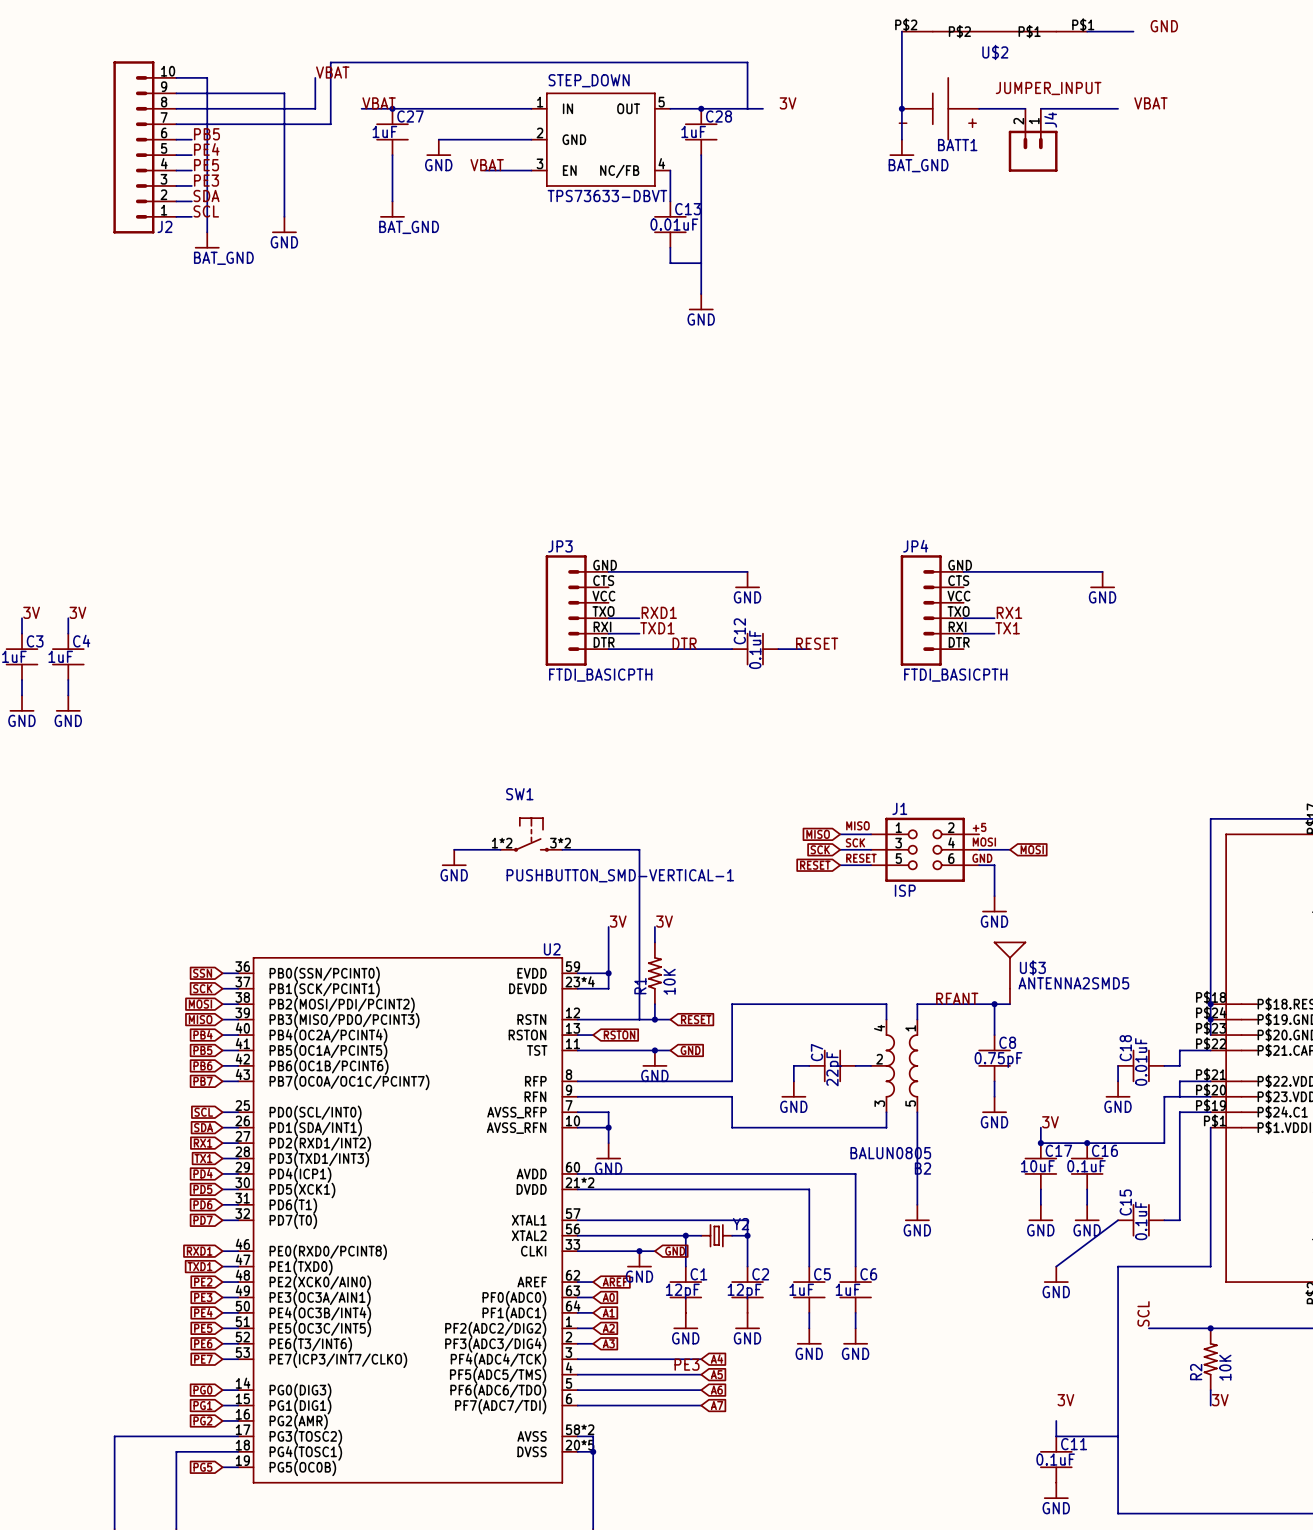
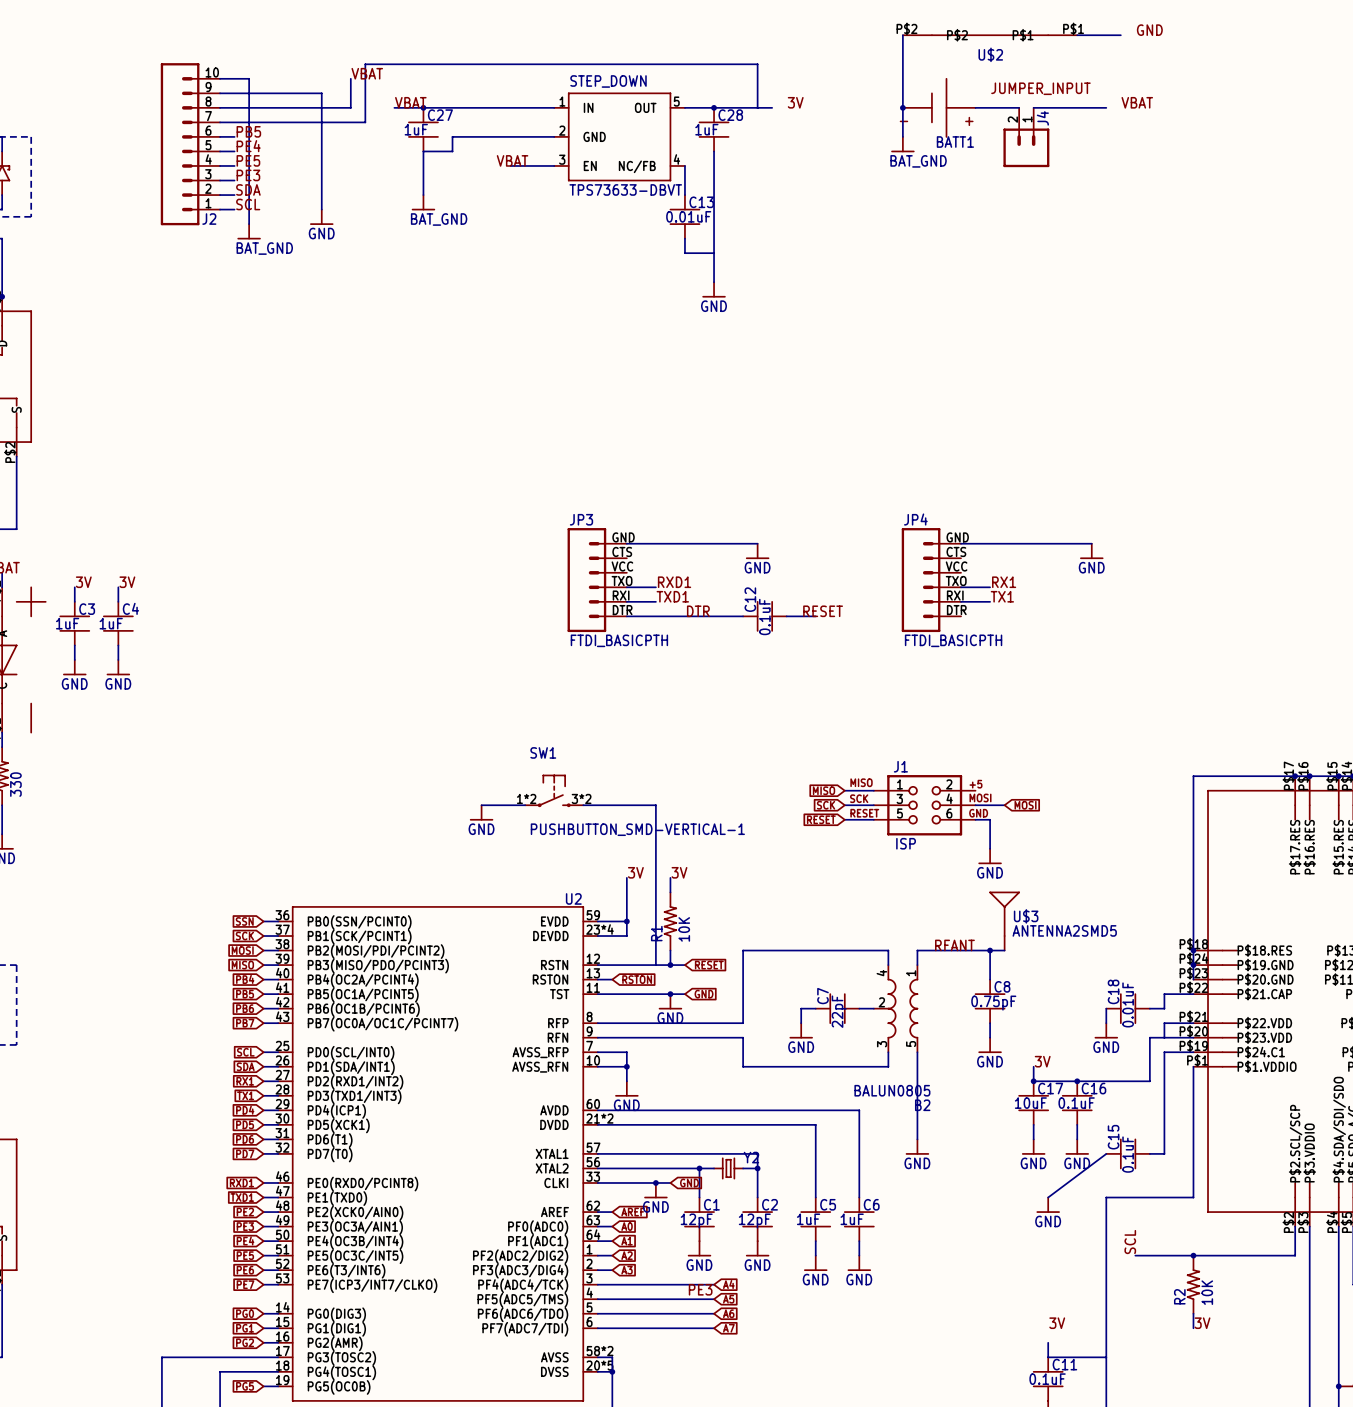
wire: none -> (467, 136) (452, 136) (452, 151) (423, 151)
power symbol: GND (438, 147) -> none

